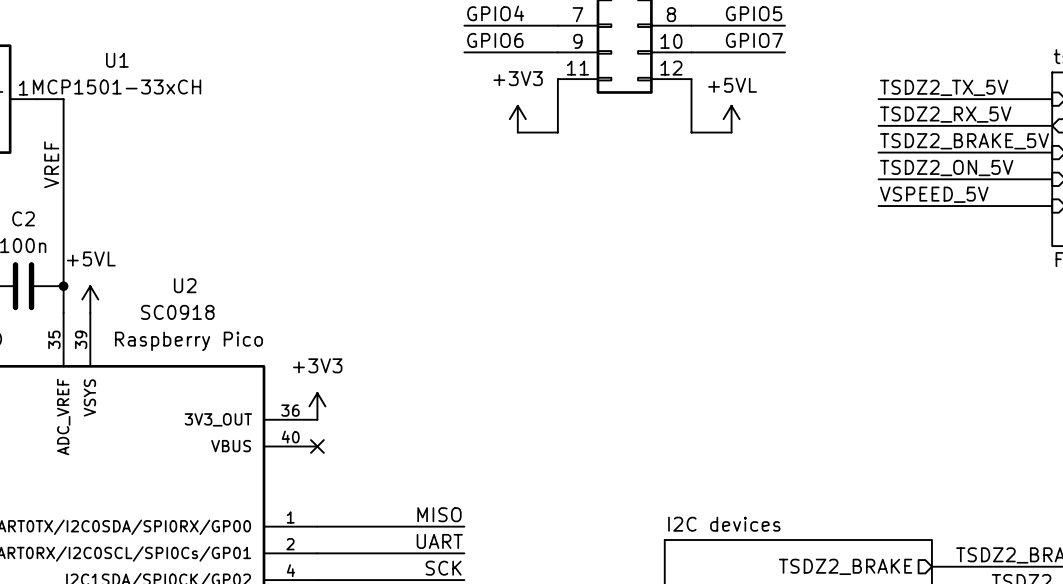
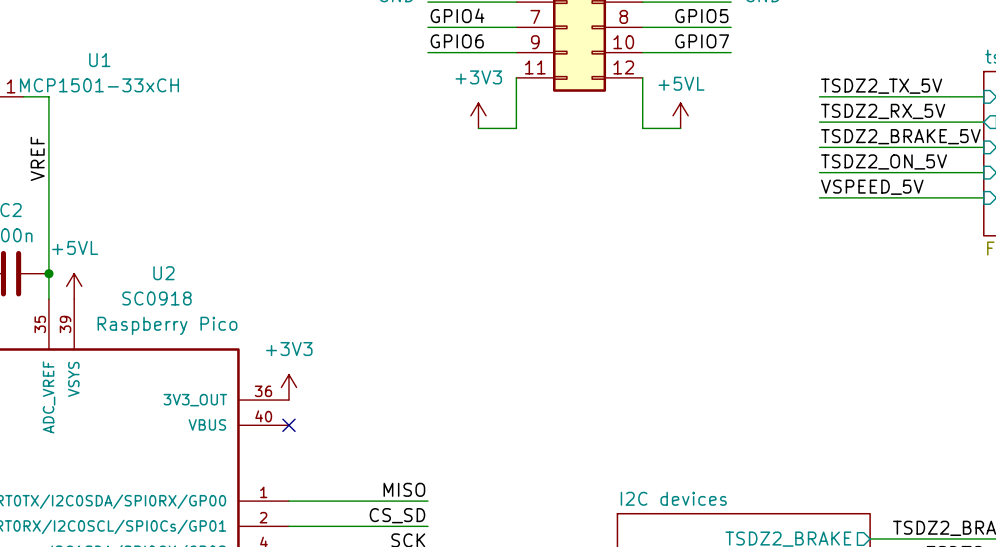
label: UART (439, 541) -> CS_SD (397, 515)

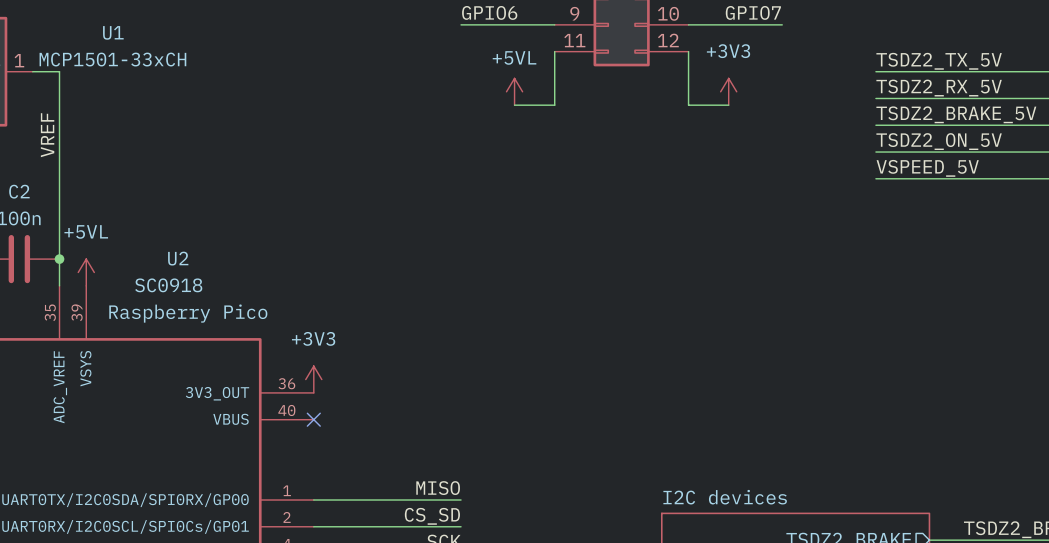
power symbol: +3V3 (478, 115) -> +5VL (514, 91)
power symbol: +5VL (680, 115) -> +3V3 (728, 91)

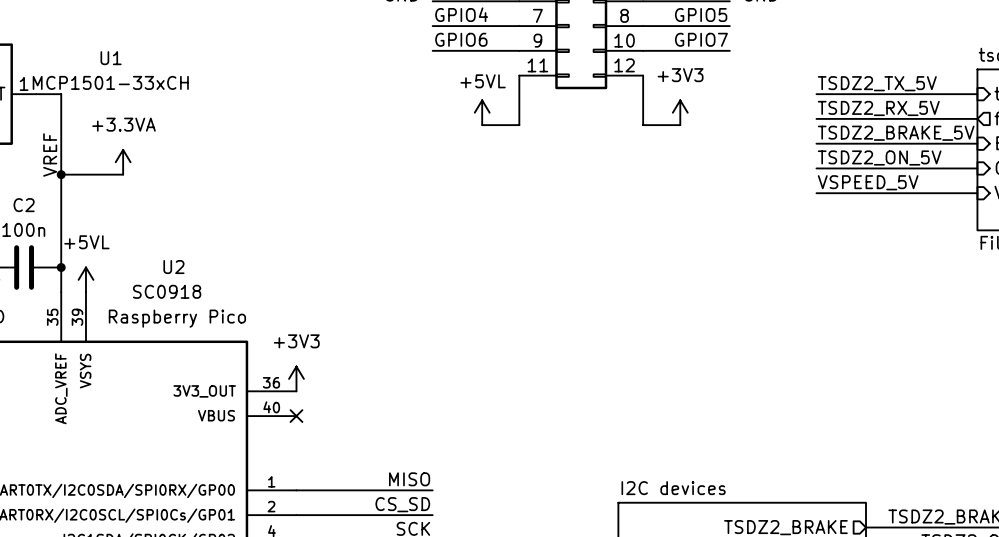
power symbol: none -> +3.3VA (123, 162)
wire: none -> (61, 174) (123, 174)
junction: none -> (61, 174)

